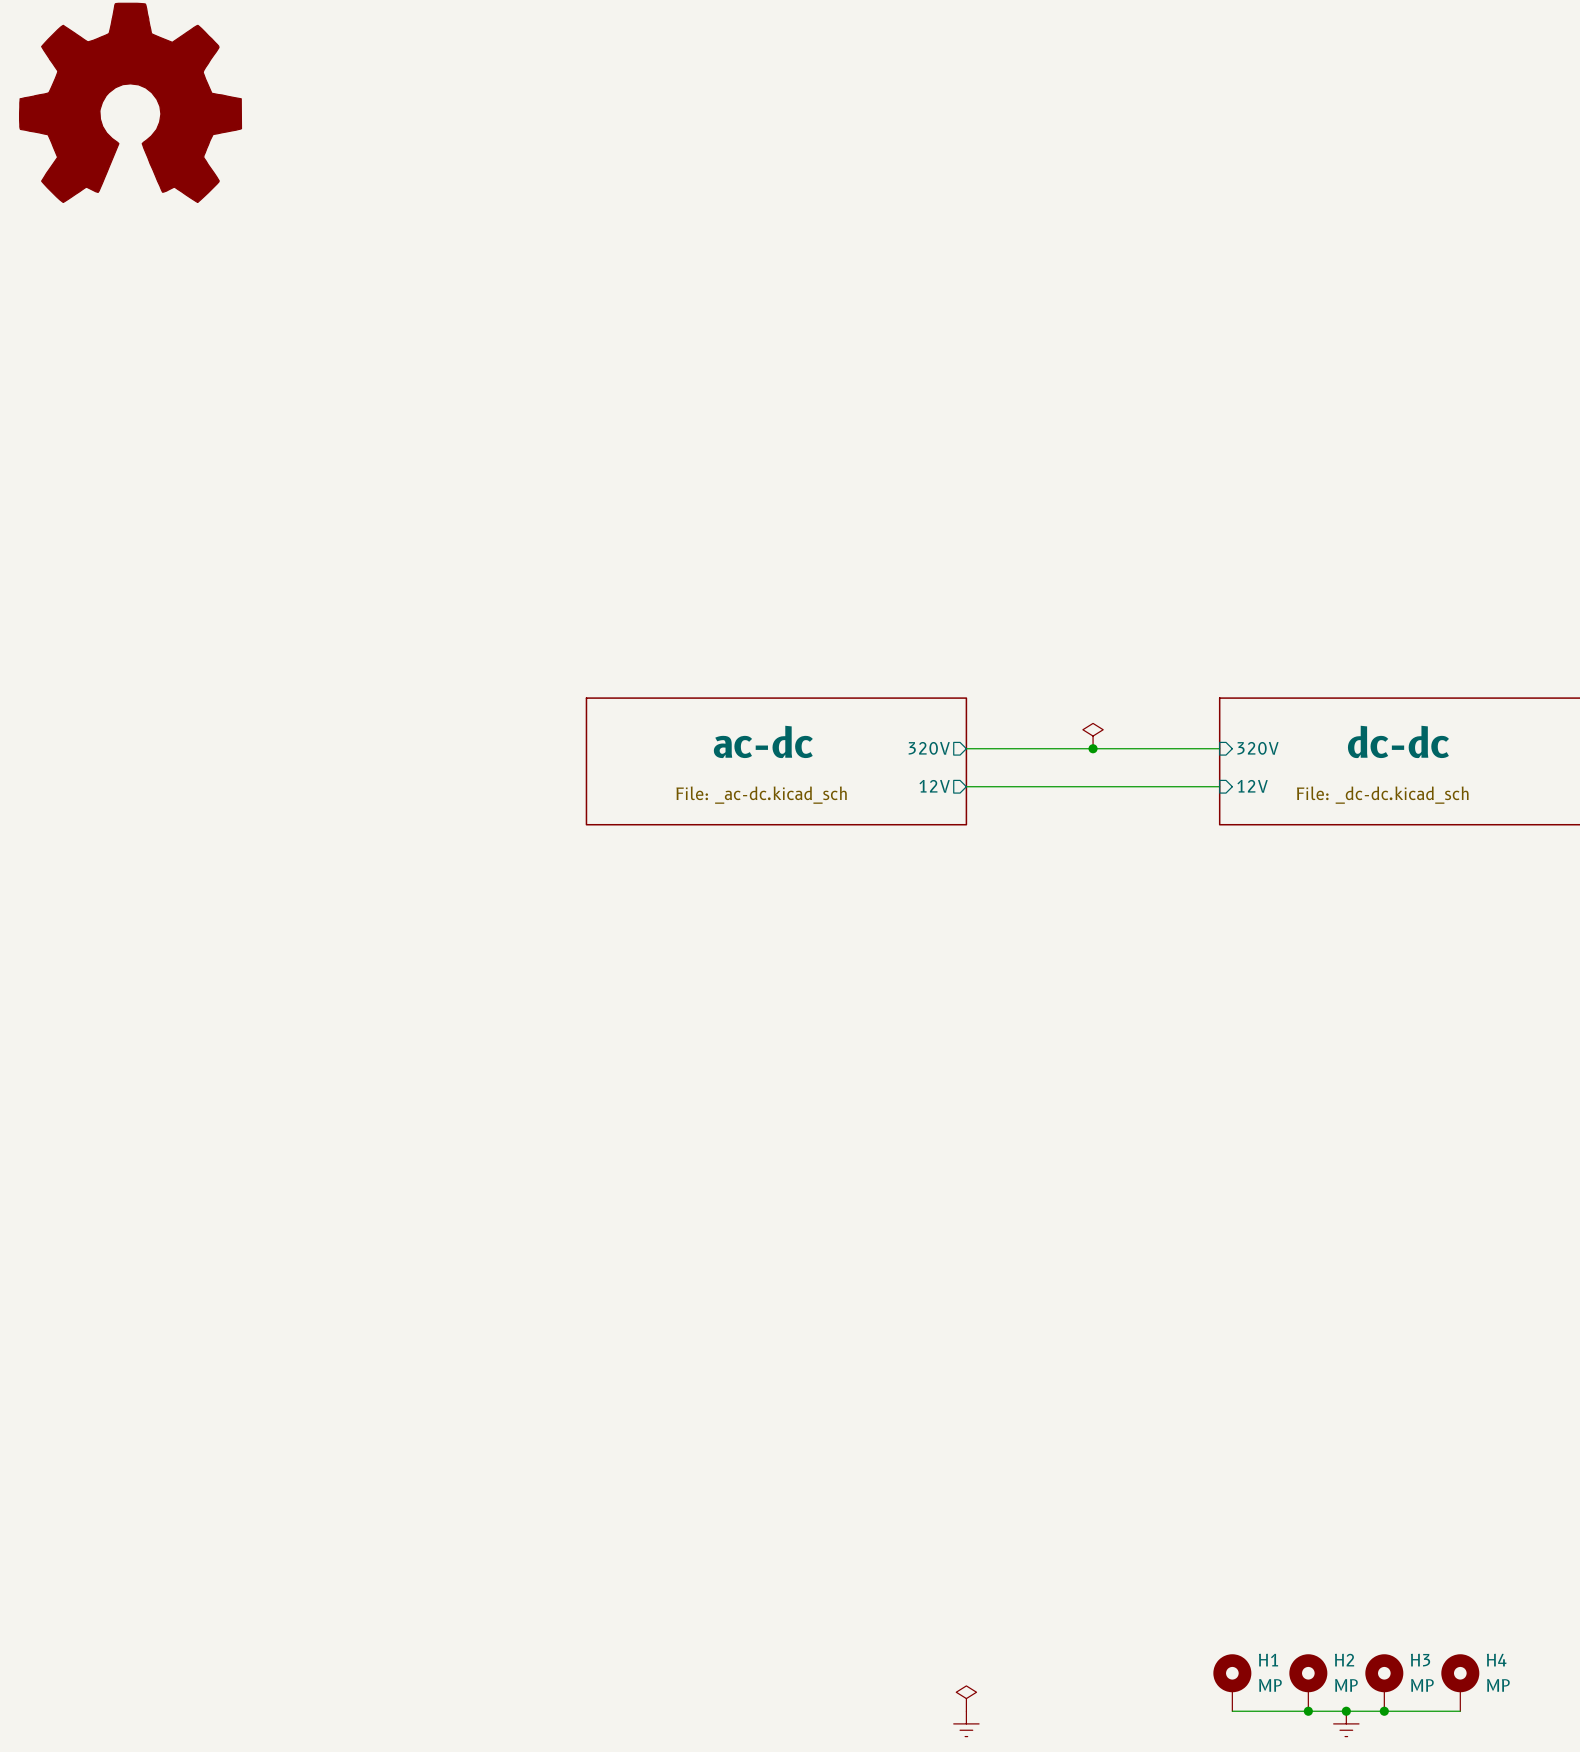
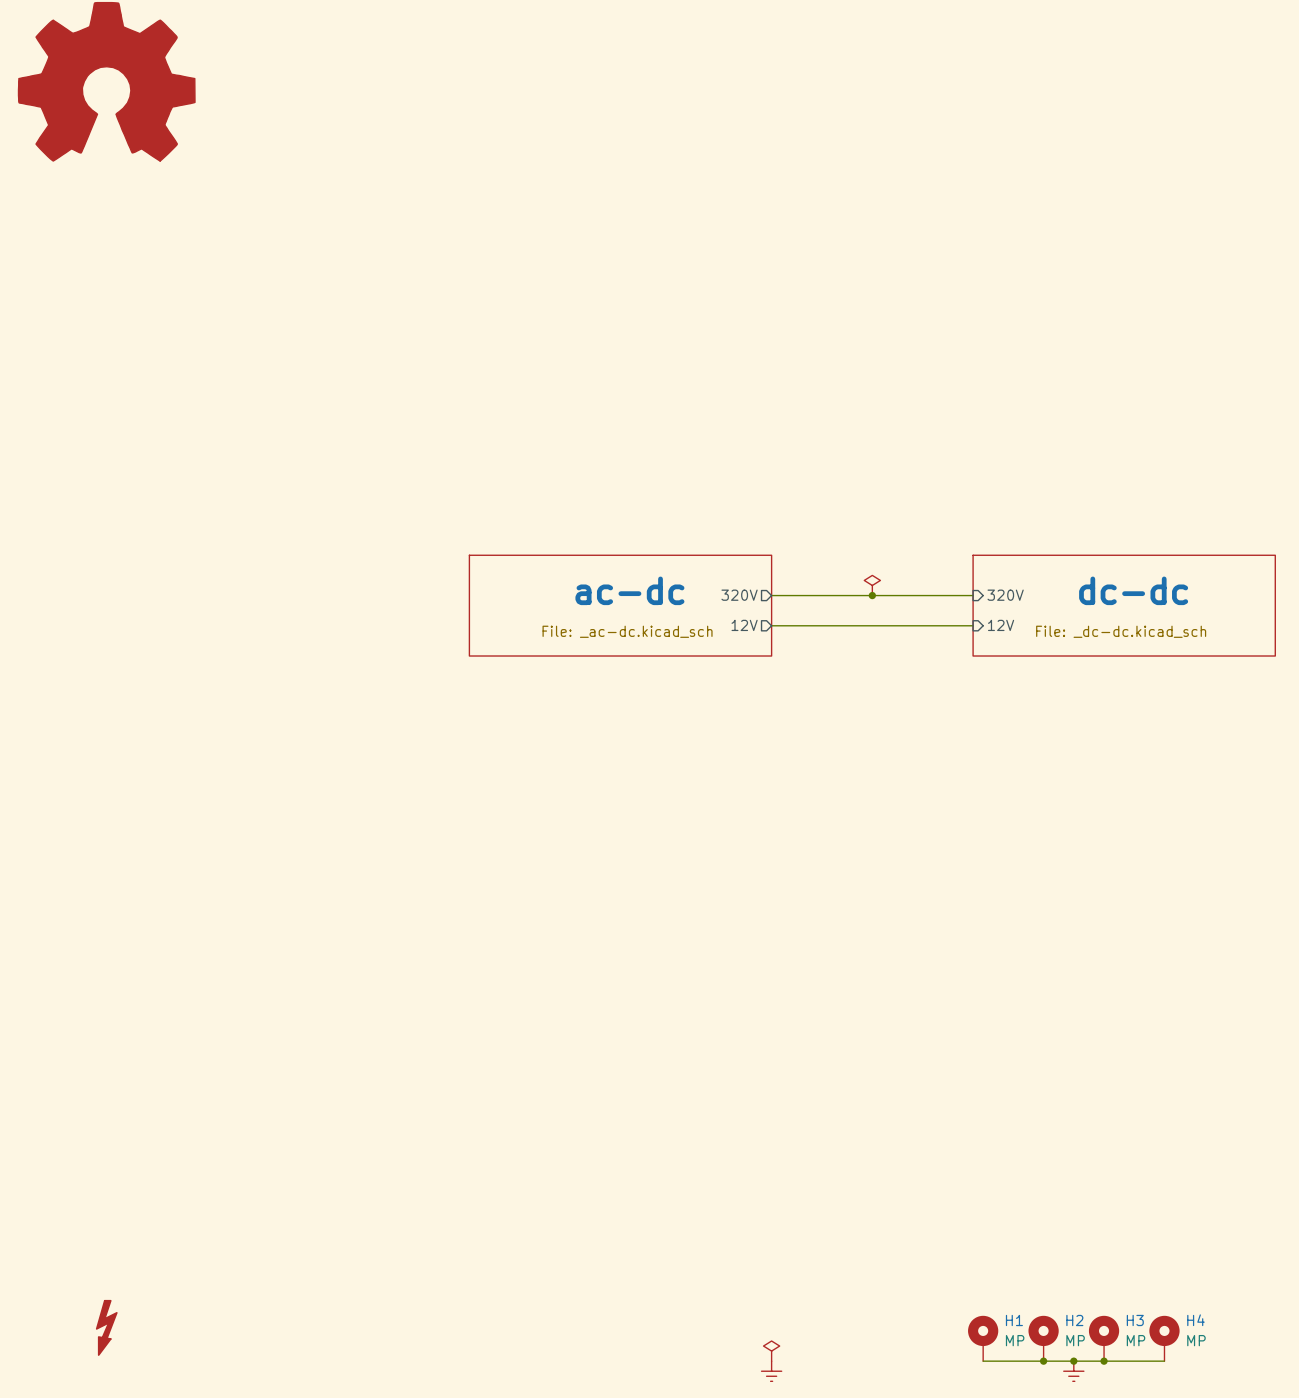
part: none -> (106, 1327)

